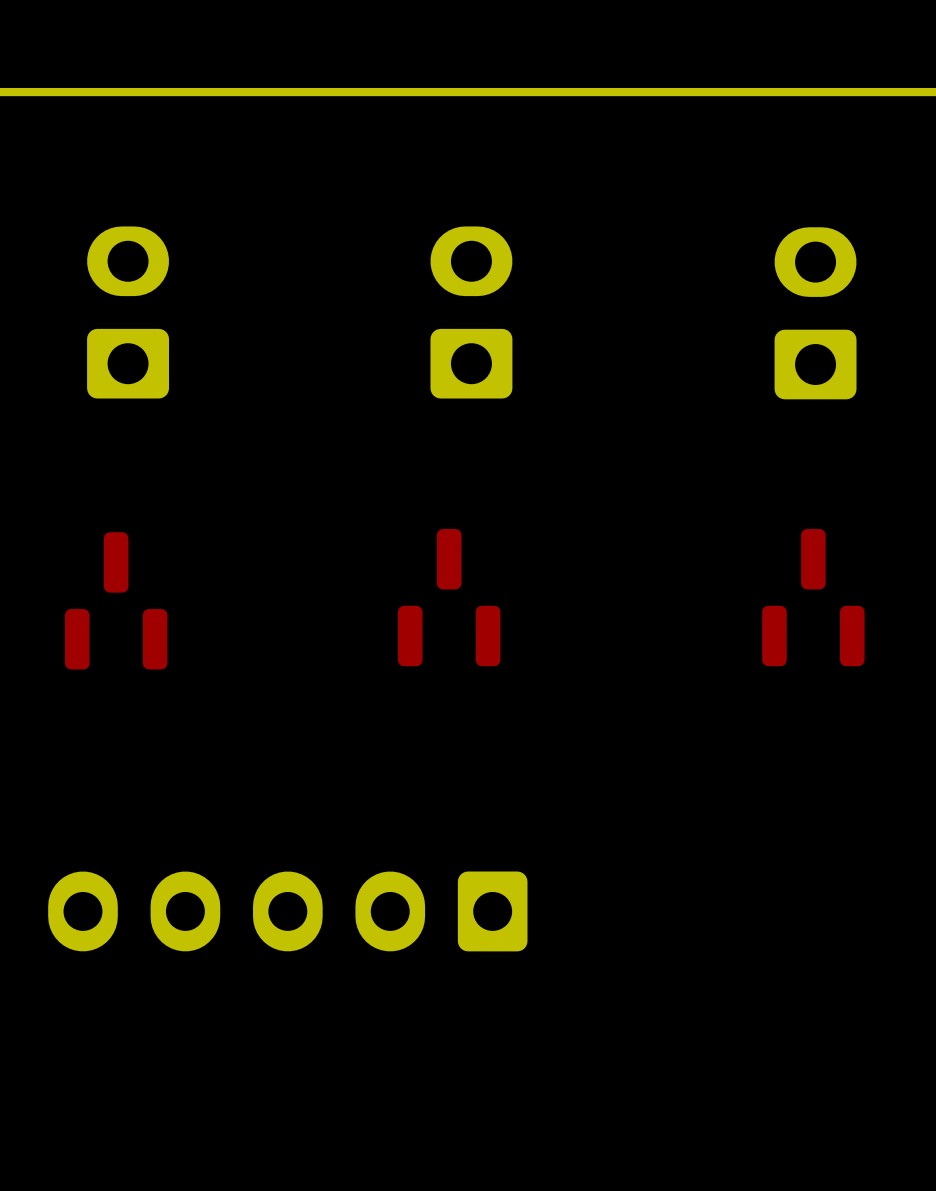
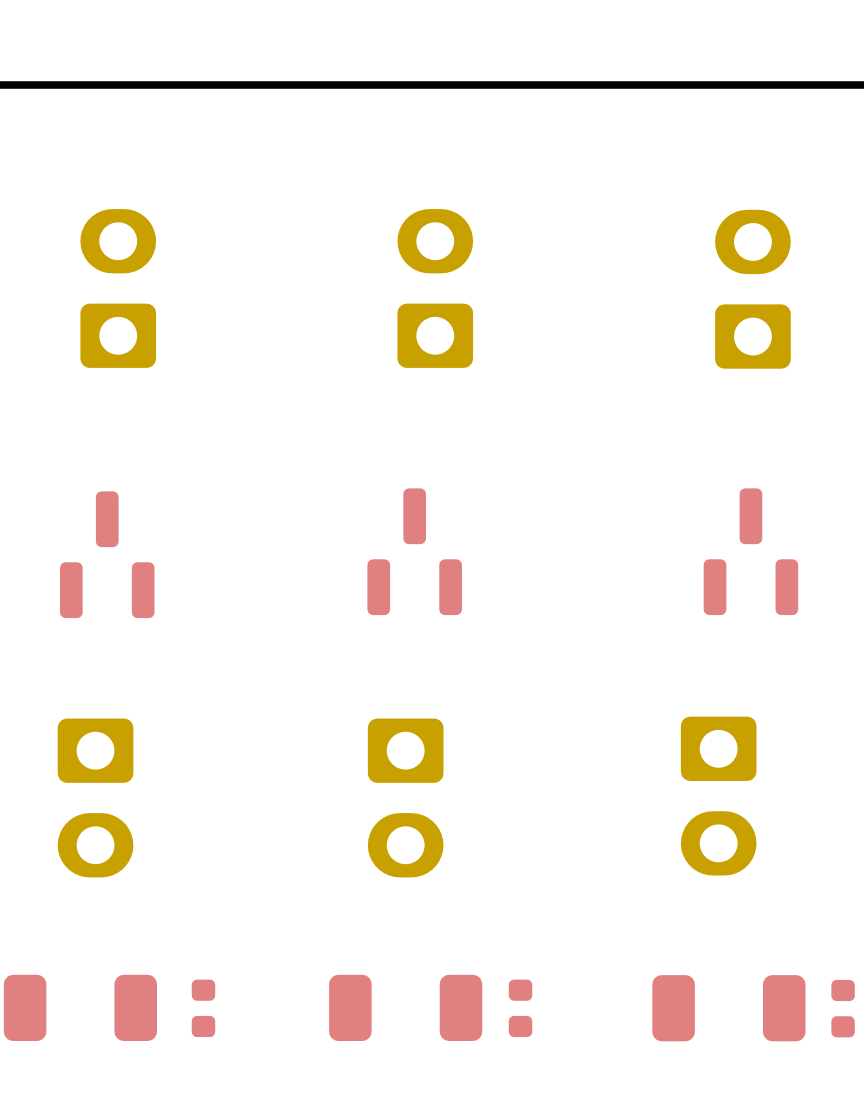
part: none -> (718, 796)
part: none -> (95, 797)
part: none -> (405, 797)
part: (287, 911) -> none
part: none -> (80, 1007)
part: none -> (405, 1007)
part: none -> (203, 1008)
part: none -> (520, 1008)
part: none -> (728, 1008)
part: none -> (843, 1008)

